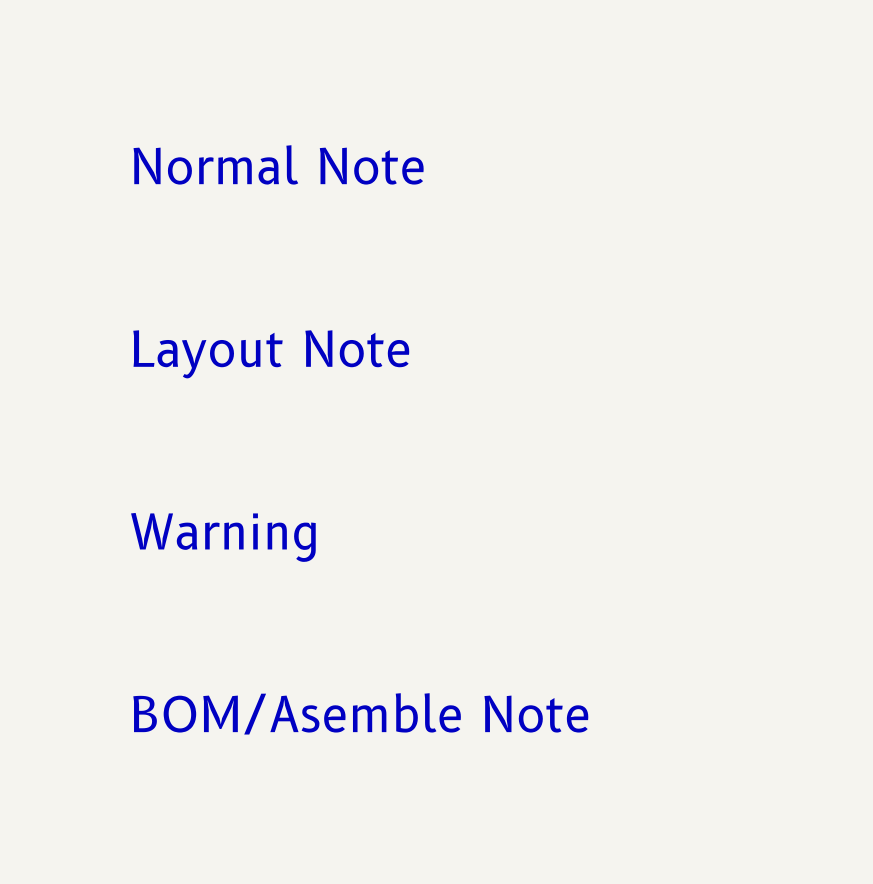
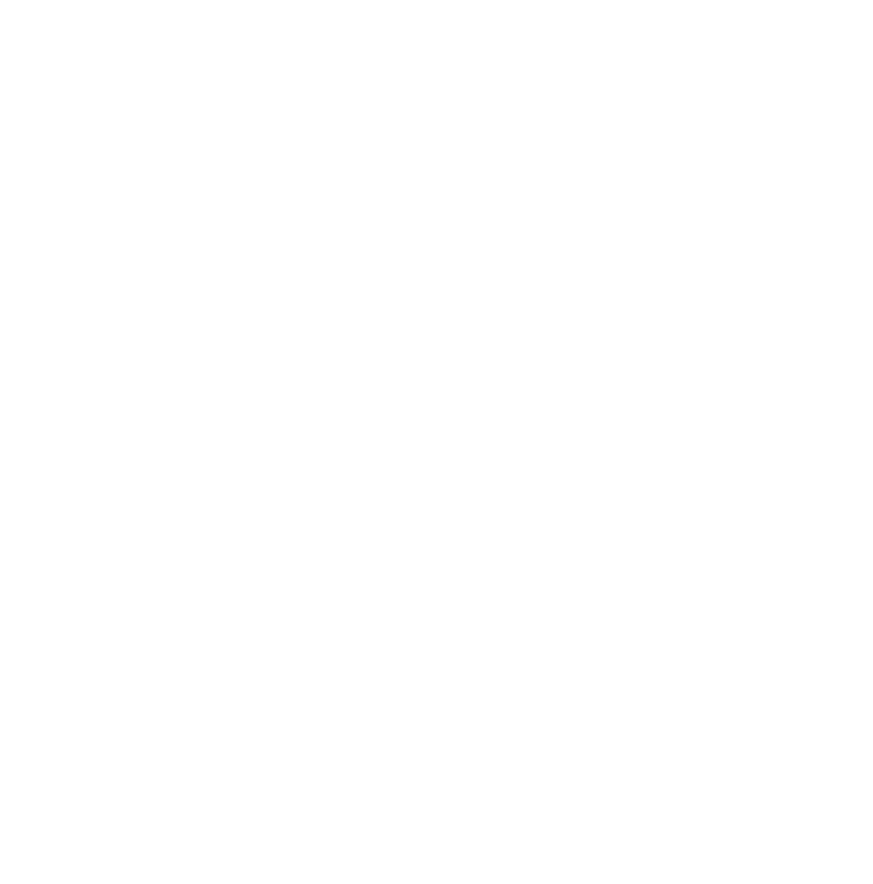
text: Normal Note (278, 164) -> none
text: Layout Note (271, 354) -> none
text: Warning (223, 537) -> none
text: BOM/Asemble Note (360, 713) -> none

